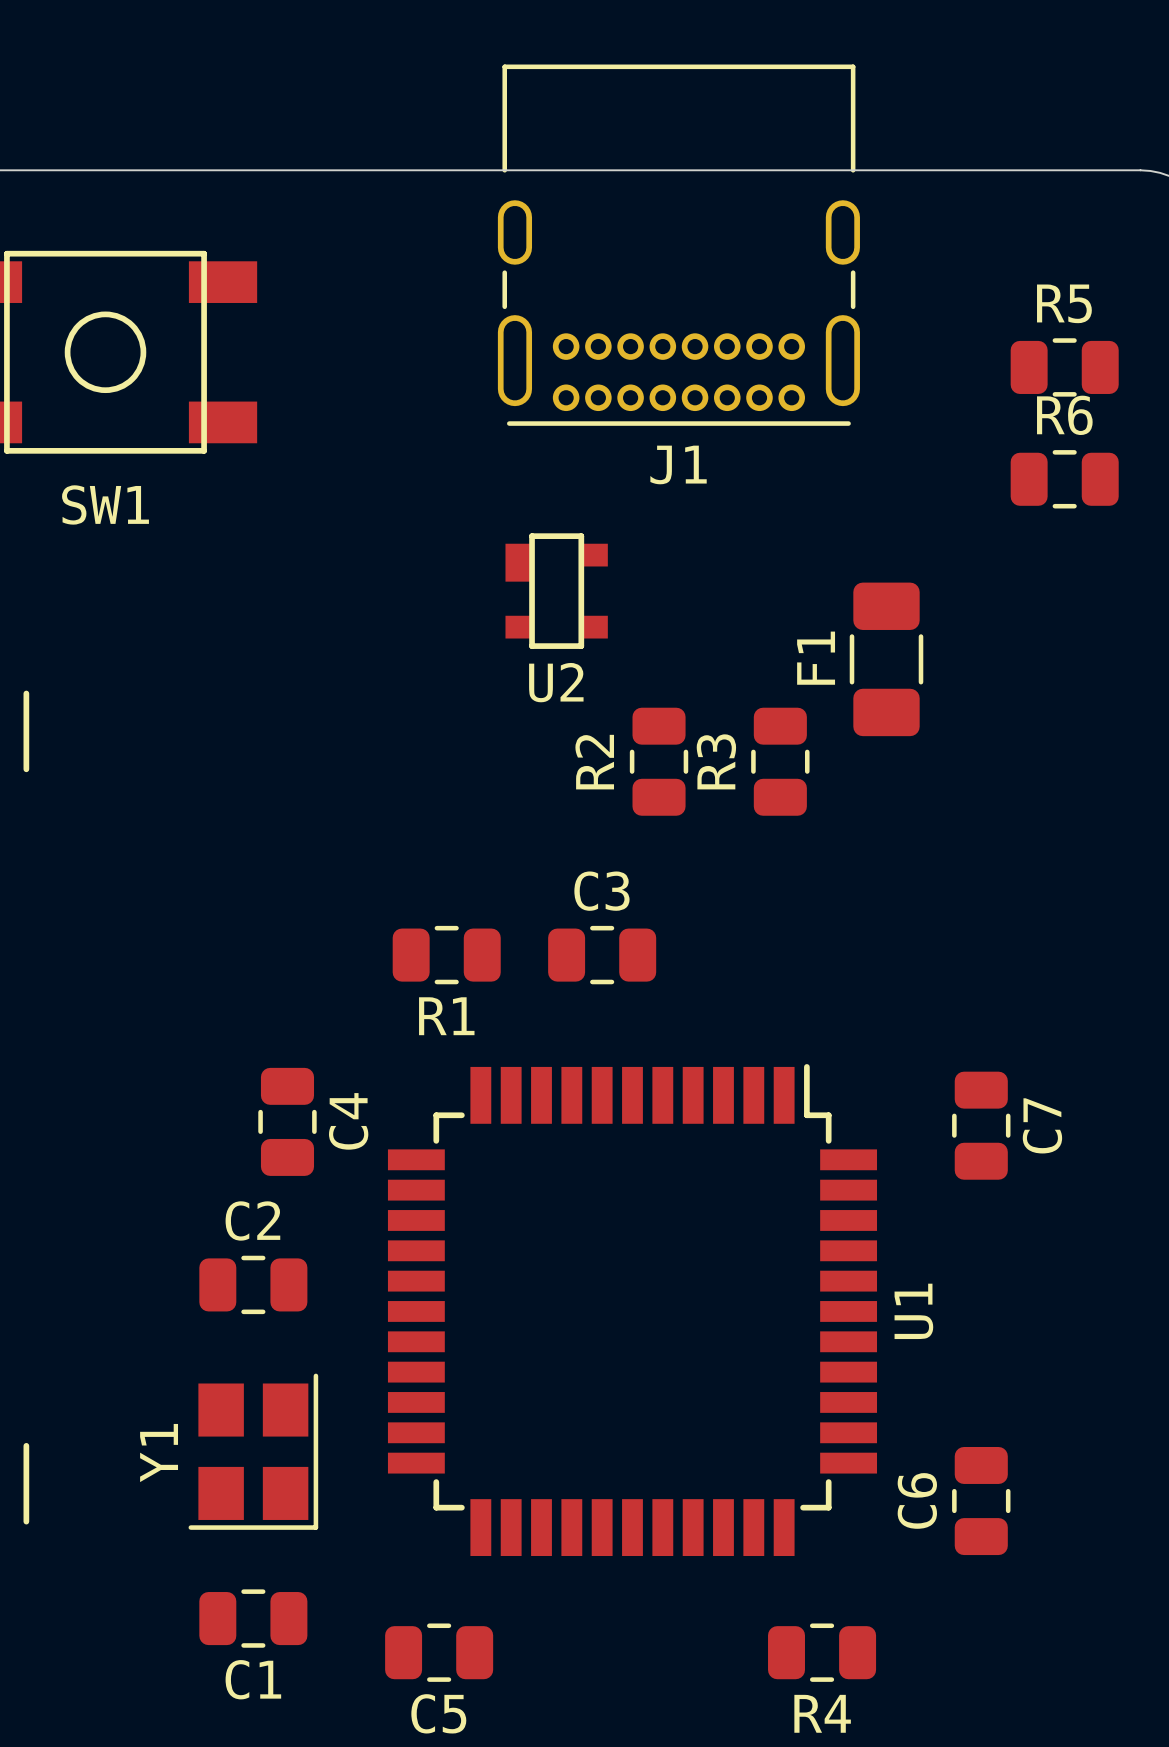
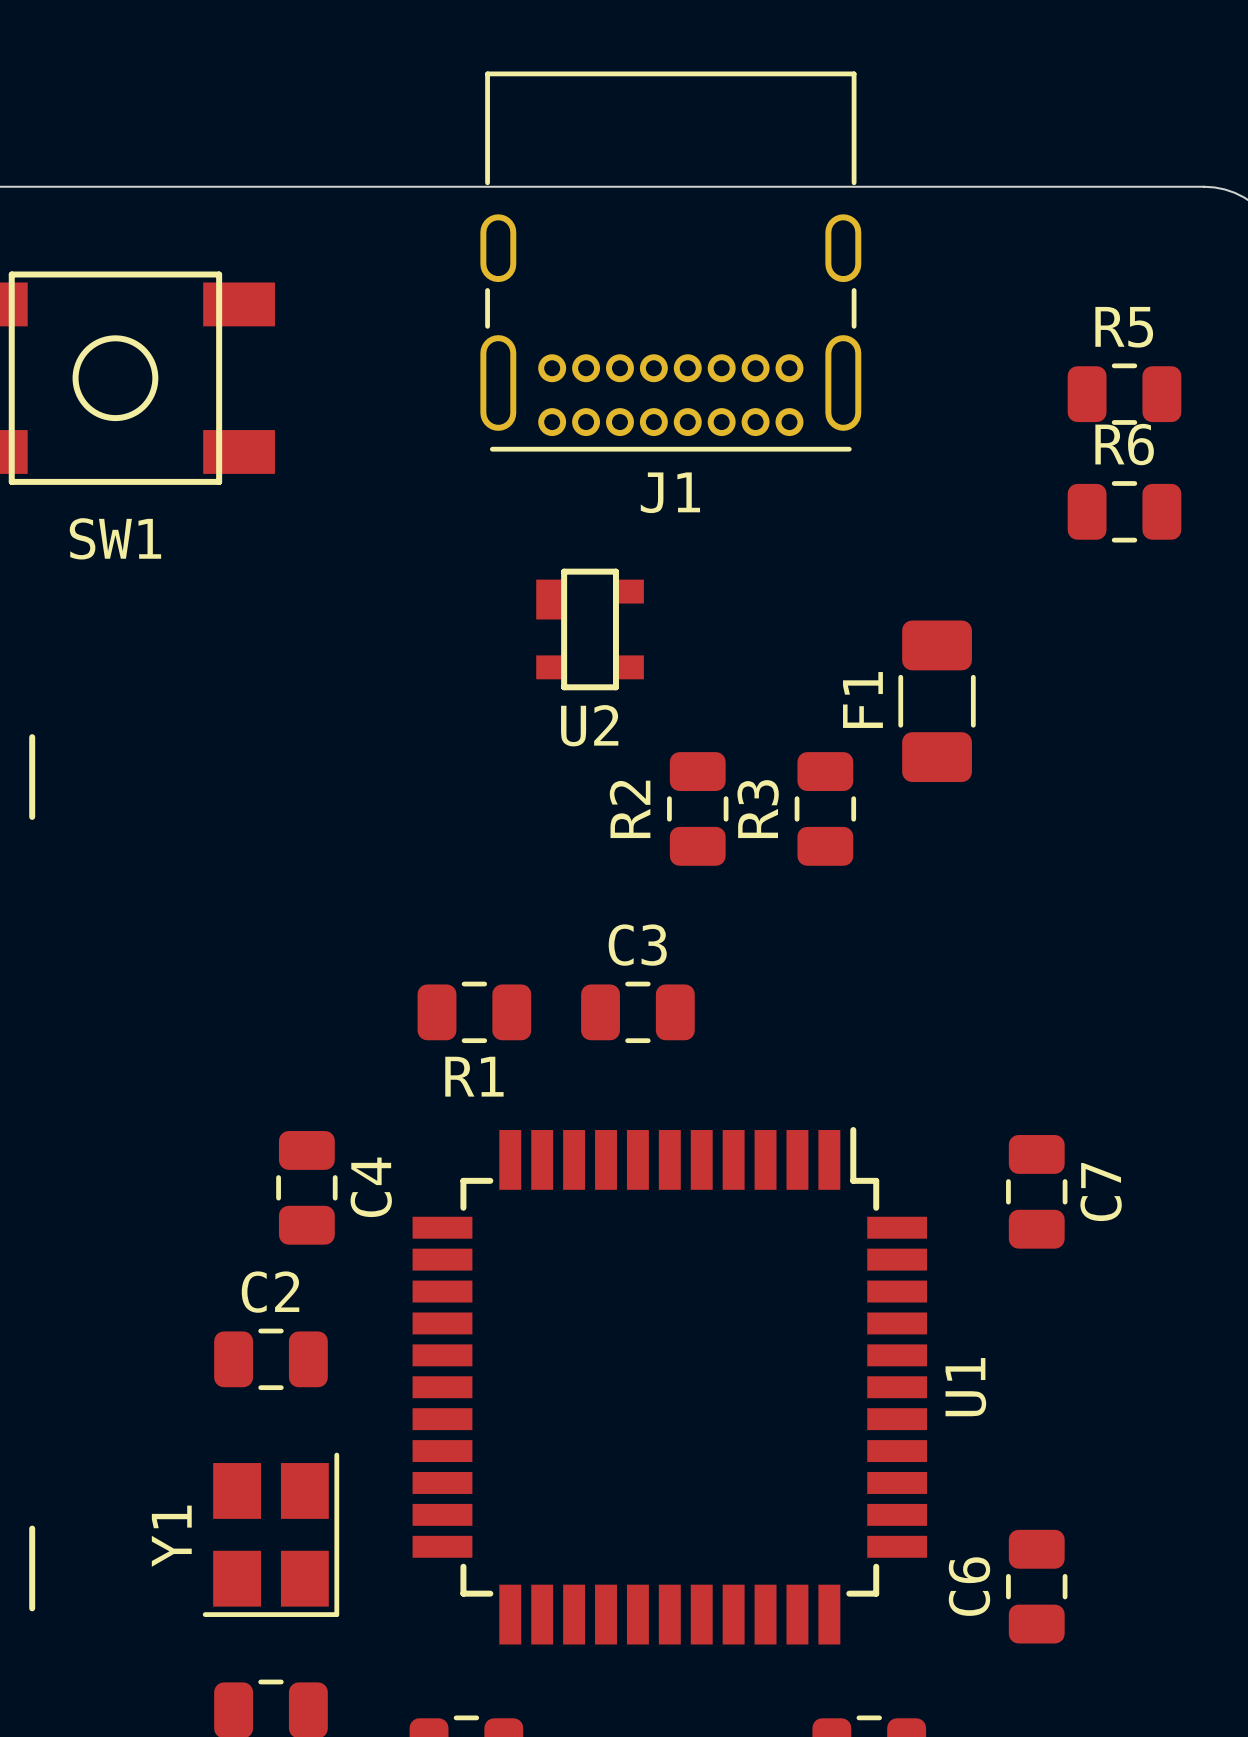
J1 position: (678, 245) -> (670, 261)

